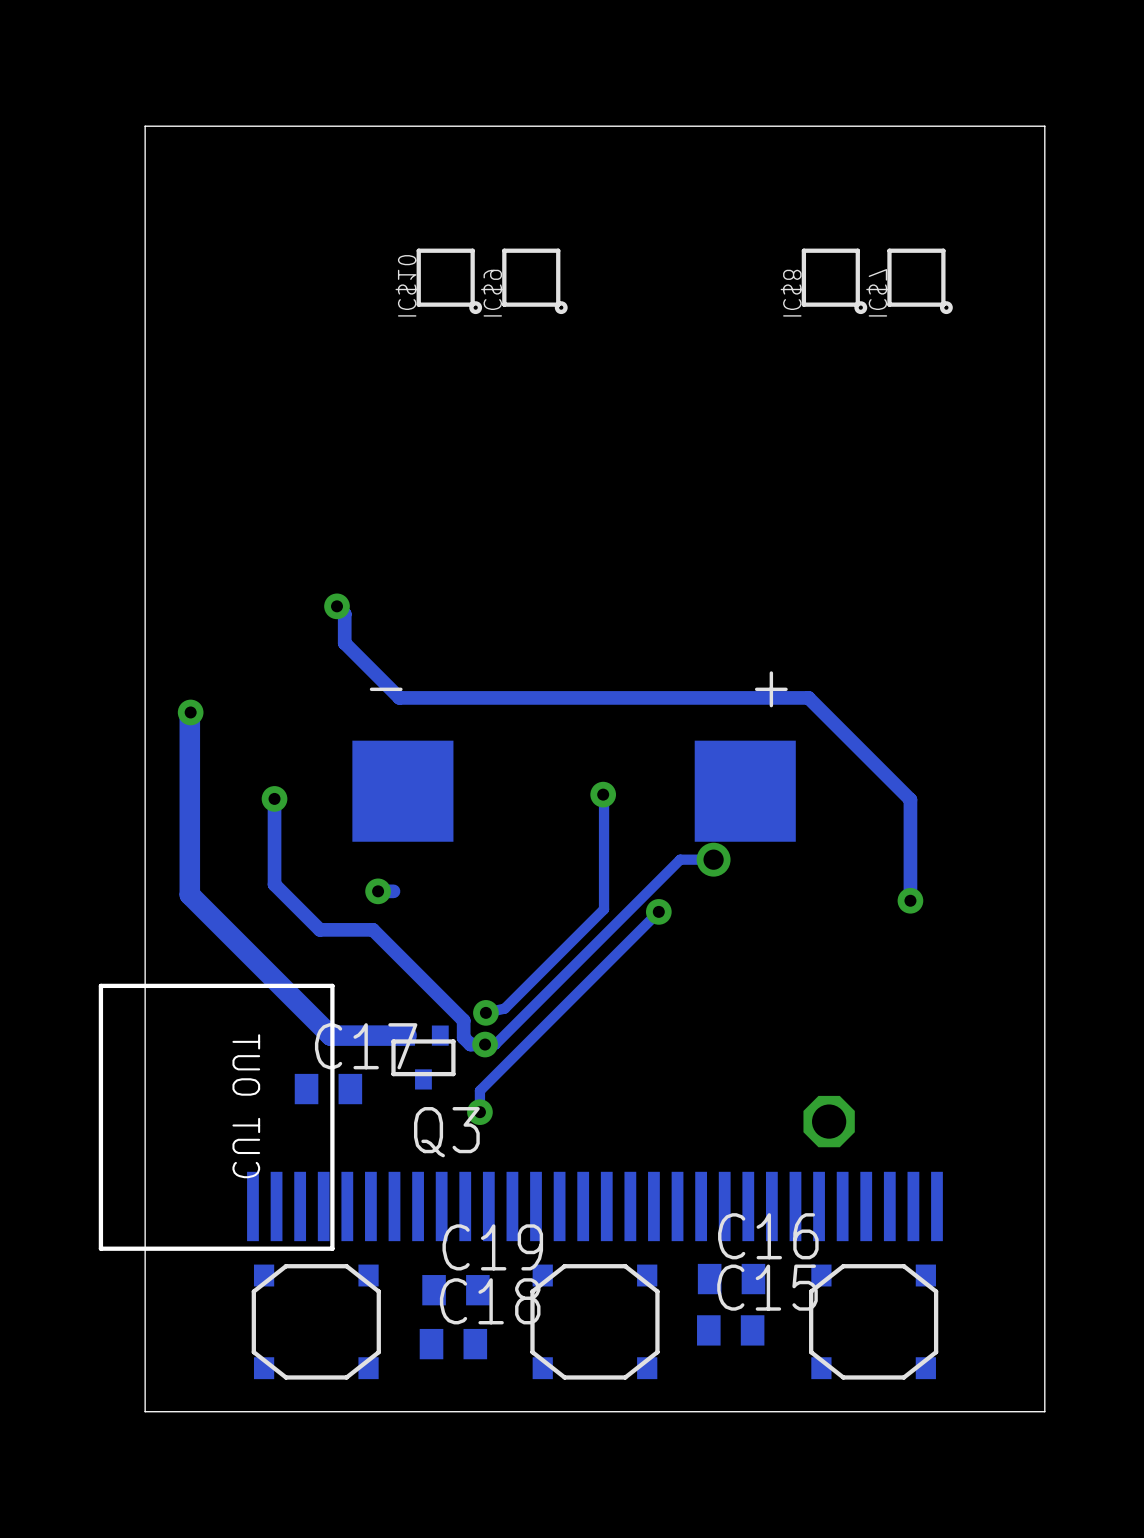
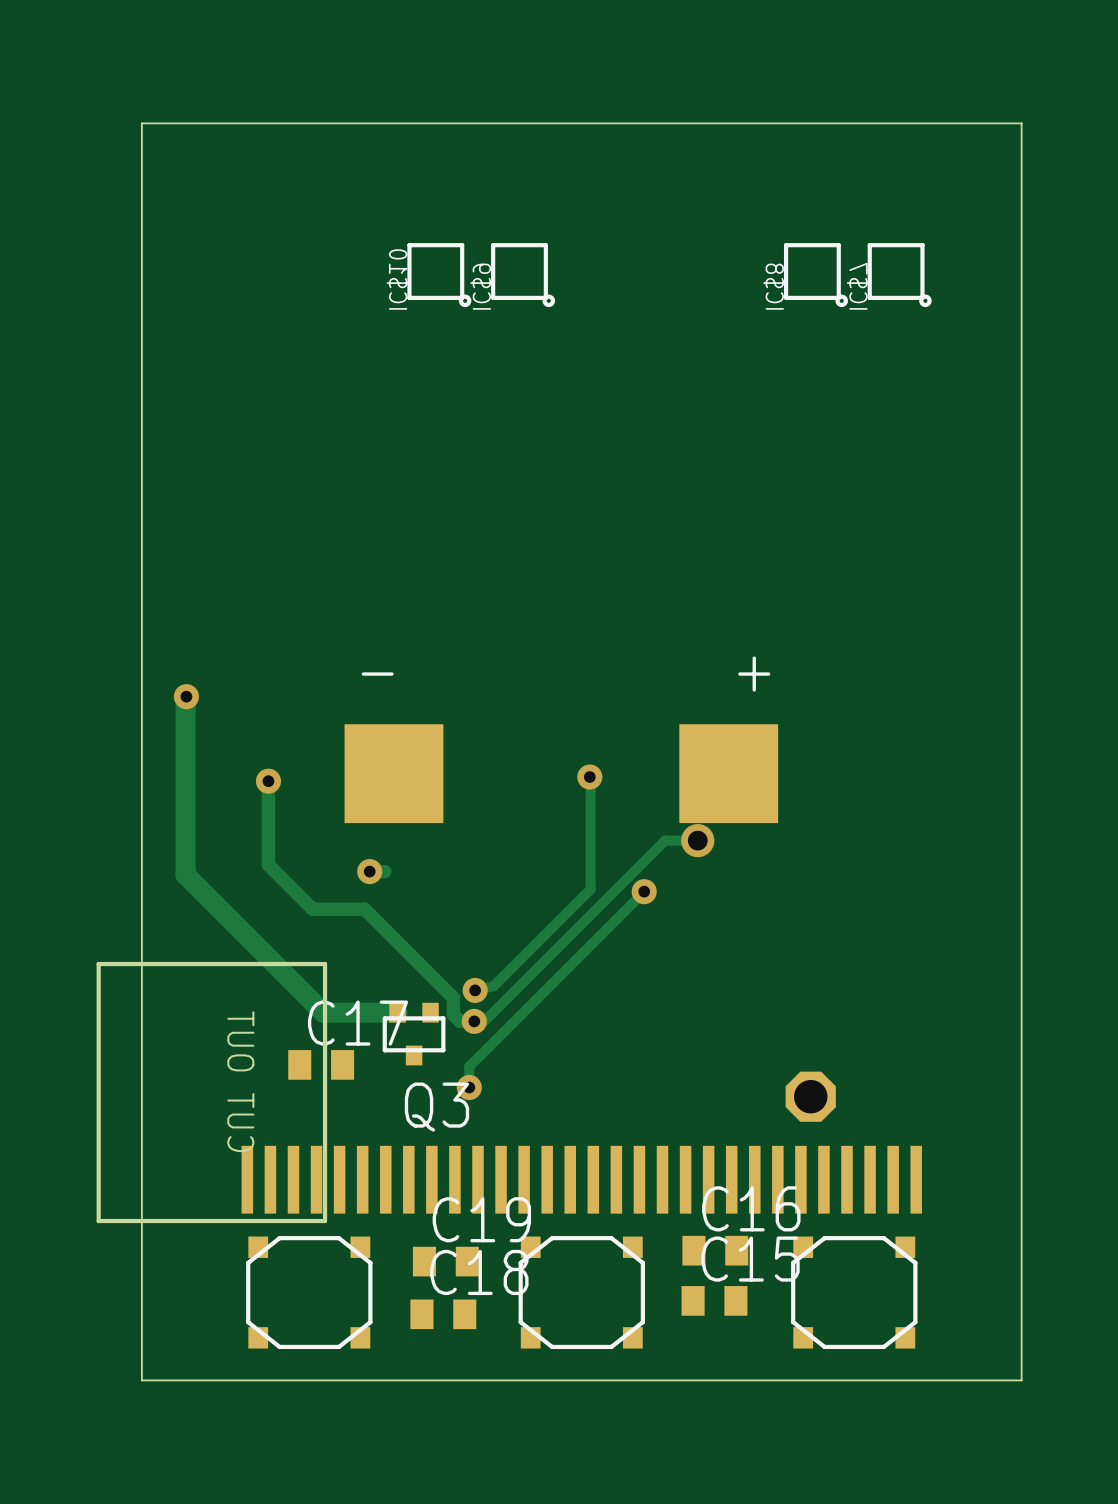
track: (337, 606) (344, 614) (344, 643) (399, 697) (808, 697) (910, 799) (910, 900) -> none
via: (337, 606) -> none
via: (910, 900) -> none

